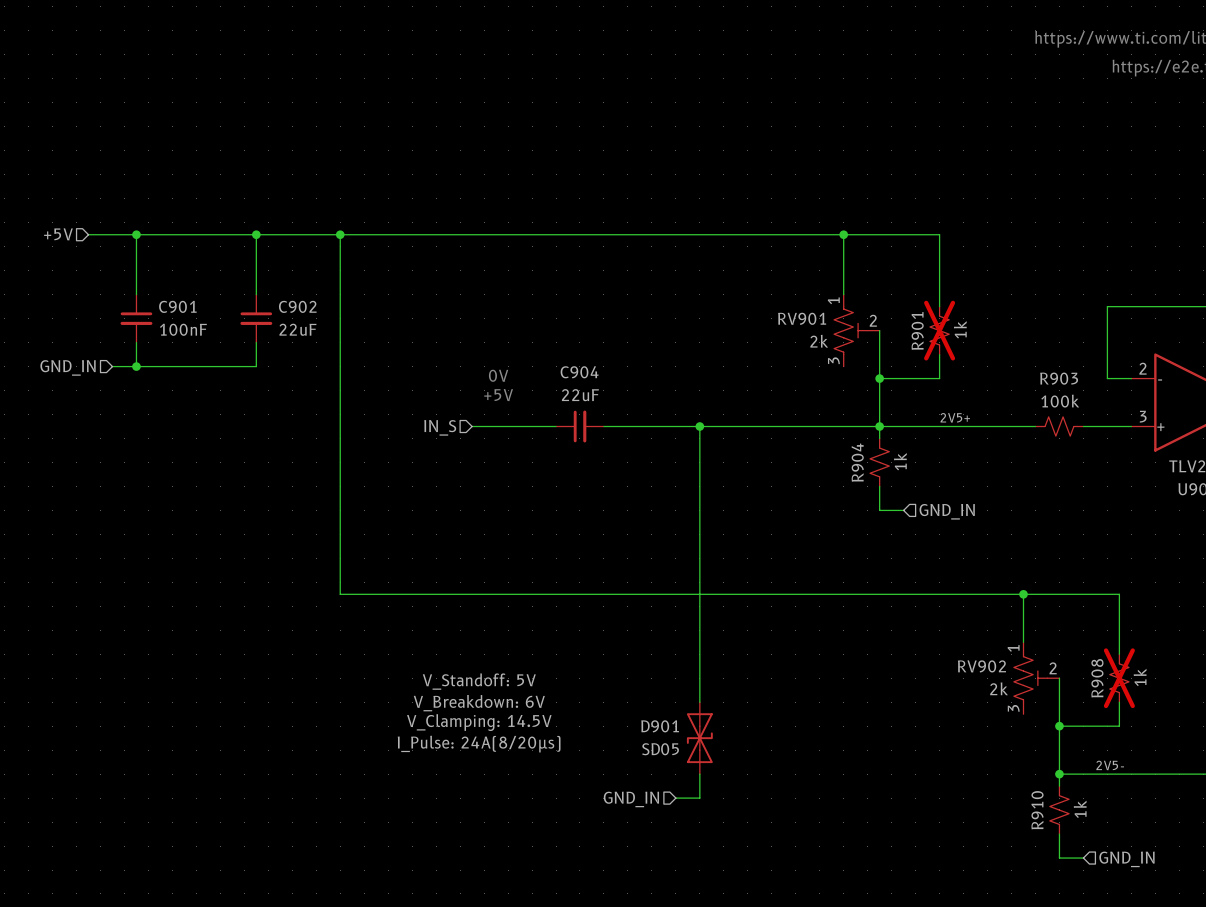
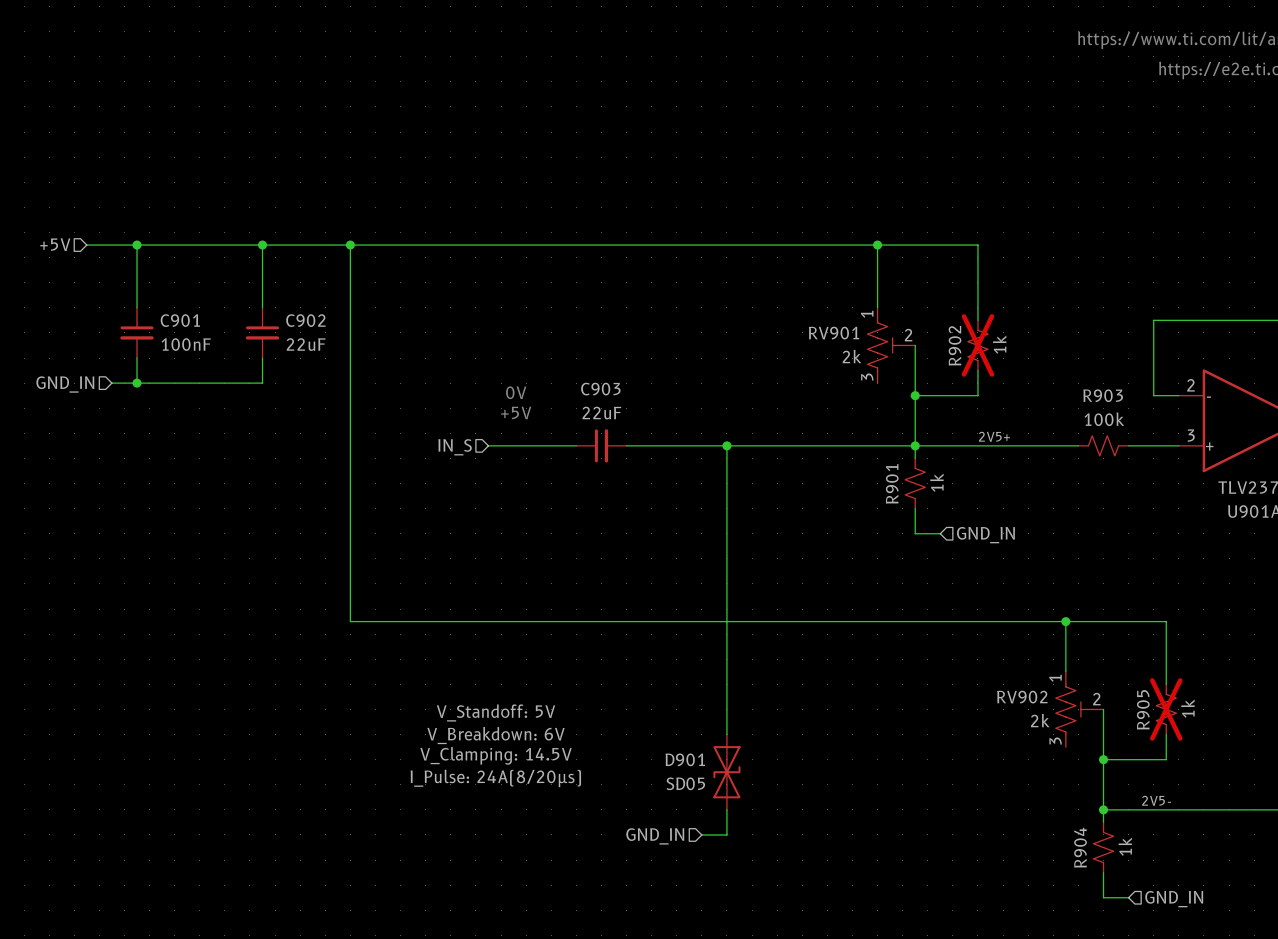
R901 name: R901 (917, 330) -> R902 (955, 345)
C904 name: C904 (579, 372) -> C903 (600, 389)
R904 name: R904 (857, 462) -> R901 (892, 483)
R908 name: R908 (1097, 678) -> R905 (1143, 709)
R910 name: R910 (1037, 810) -> R904 (1080, 847)

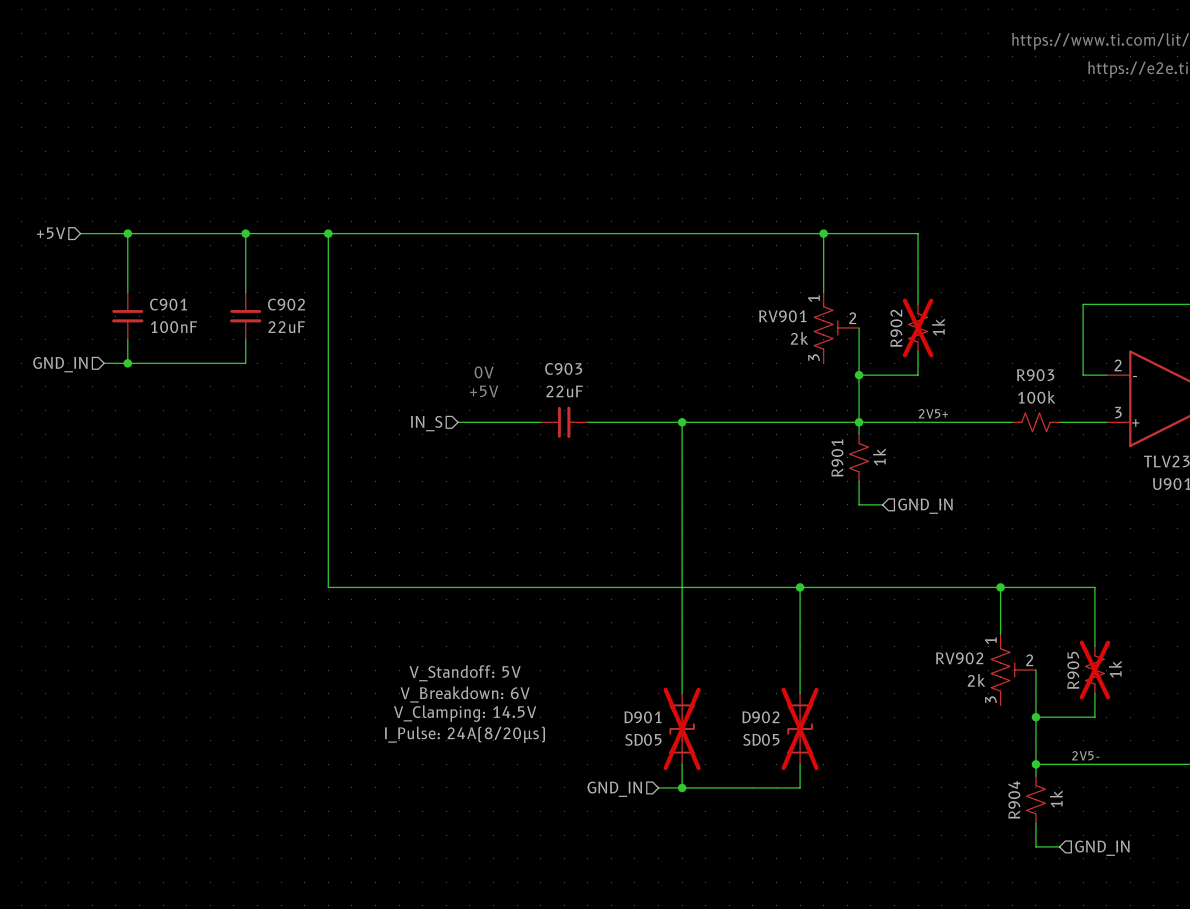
wire: none -> (800, 587) (800, 693)
junction: none -> (800, 587)
D901 do-not-place cross: none -> (682, 728)
D902: none -> SD05 (800, 728)
wire: none -> (800, 764) (800, 787) (682, 787)
junction: none -> (682, 787)

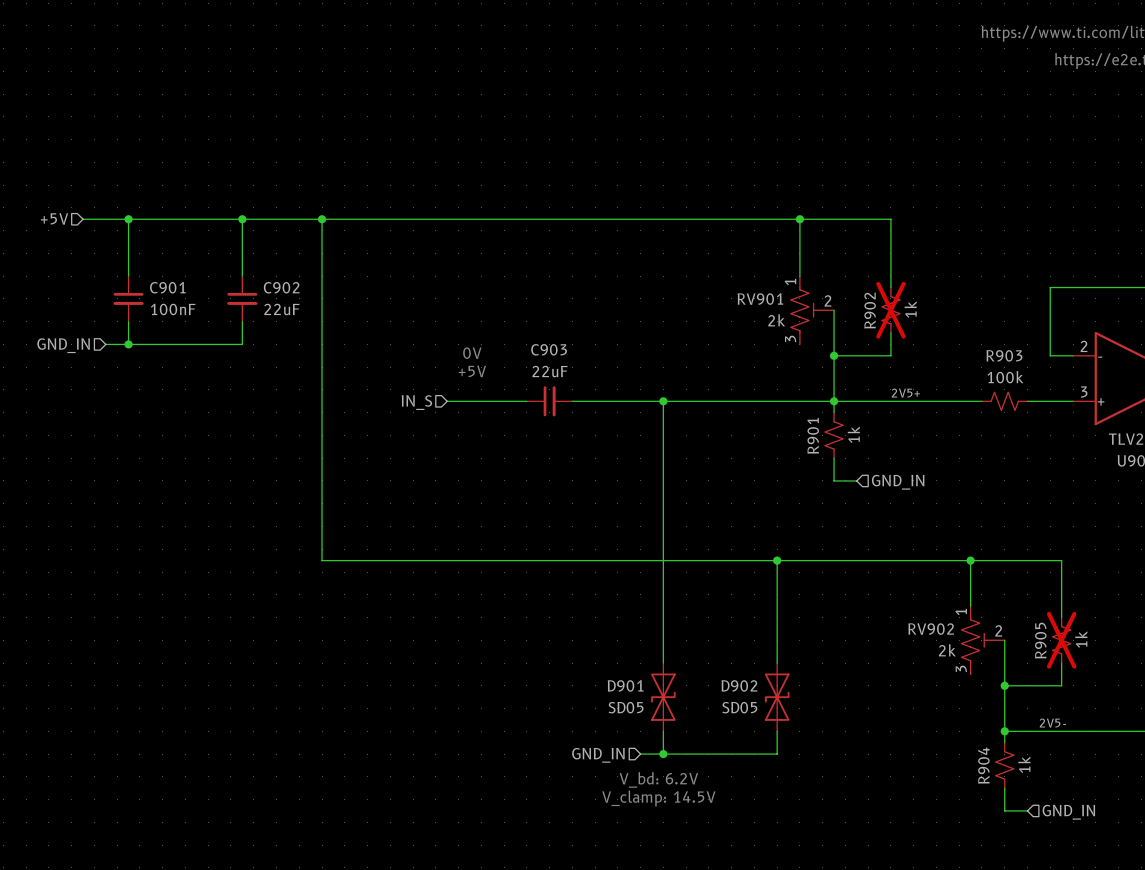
D901 text: V_Standoff: 5V (465, 673) -> none
D901 text: V_Breakdown: 6V (465, 694) -> none
D901 text: V_Clamping: 14.5V (465, 713) -> none
D901 do-not-place cross: (682, 728) -> none
D902 do-not-place cross: (800, 728) -> none
D901 text: I_Pulse: 24A(8/20µs) (464, 734) -> none
text: none -> V_bd: 6.2V (658, 779)
text: none -> V_clamp: 14.5V (658, 798)

